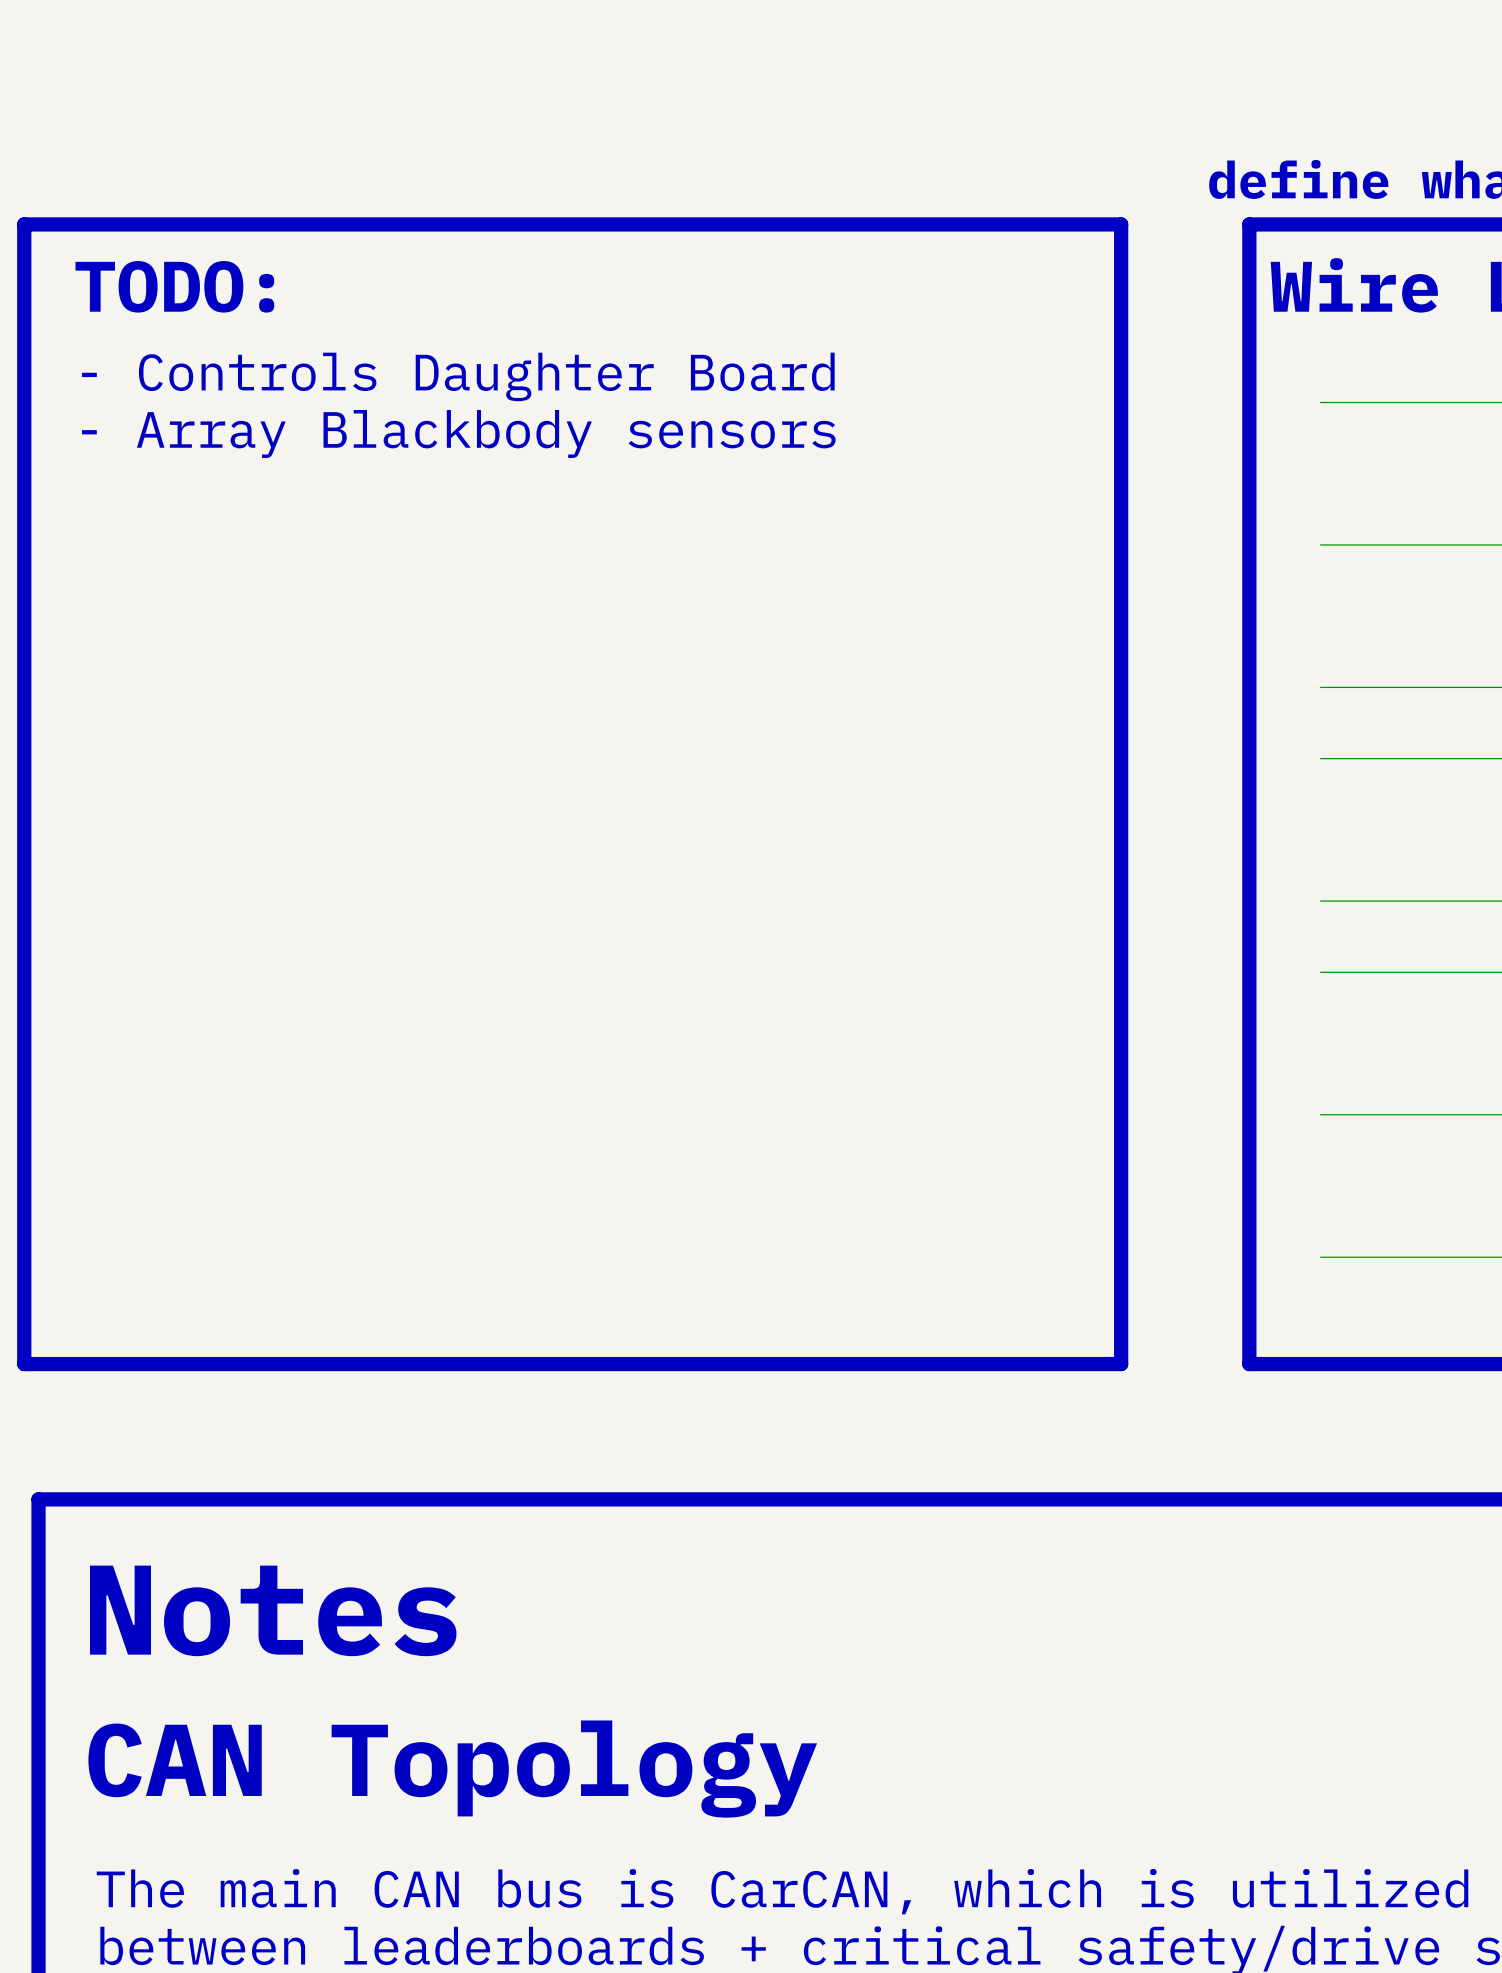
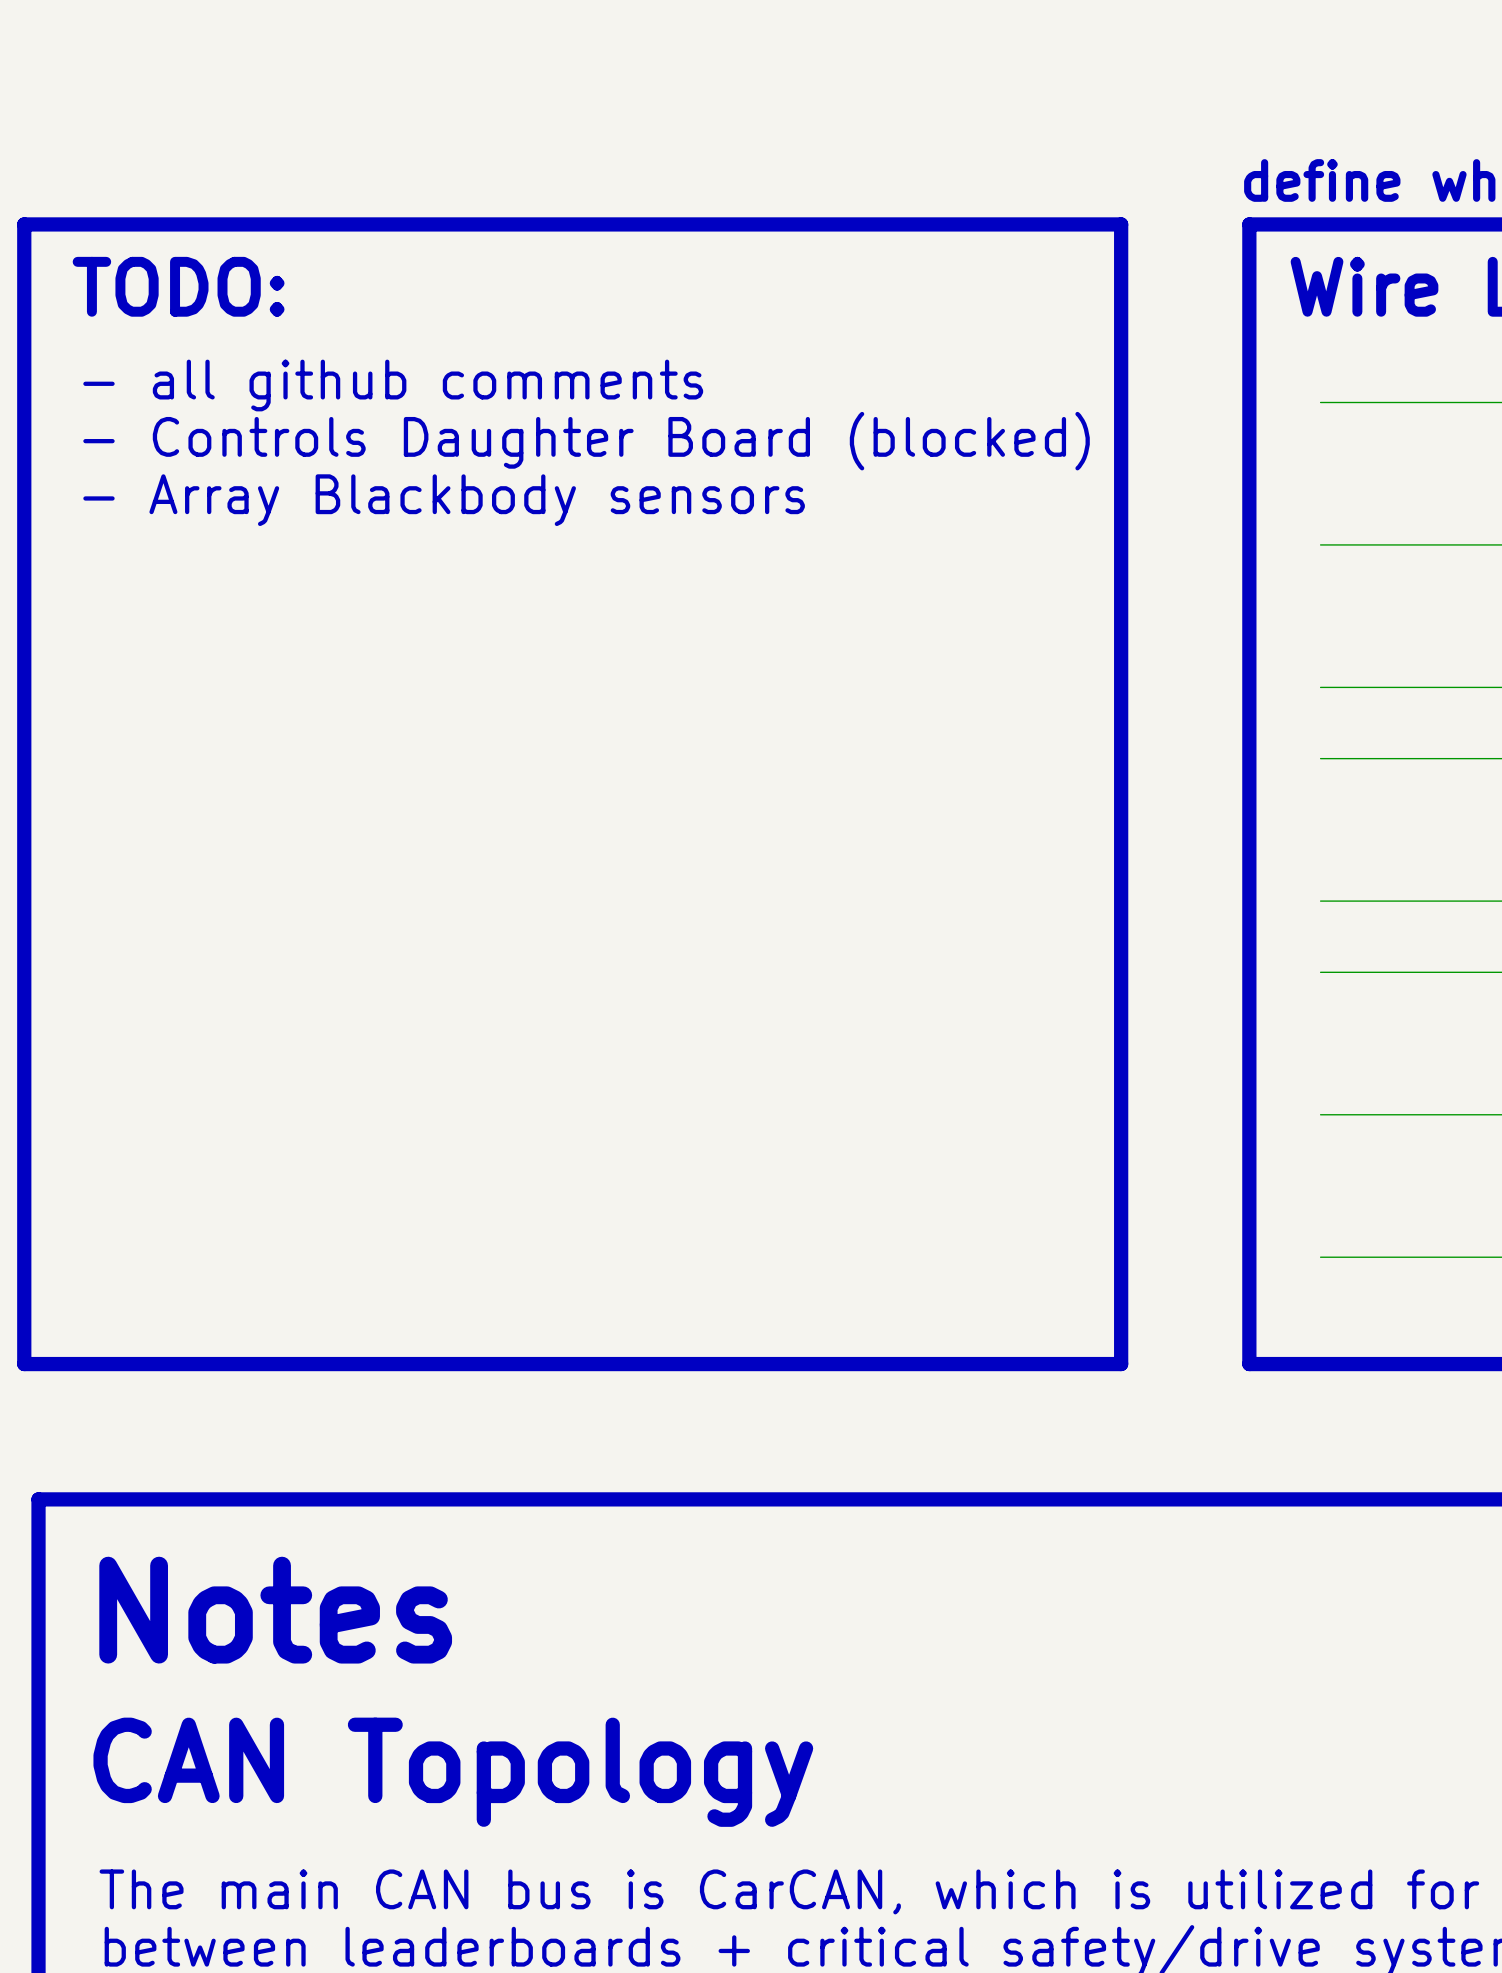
text: - Controls Daughter Board (458, 376) -> - all github comments (393, 385)
text position: - Array Blackbody sensors (458, 433) -> - Array Blackbody sensors (444, 500)
text: none -> - Controls Daughter Board (blocked) (586, 441)

